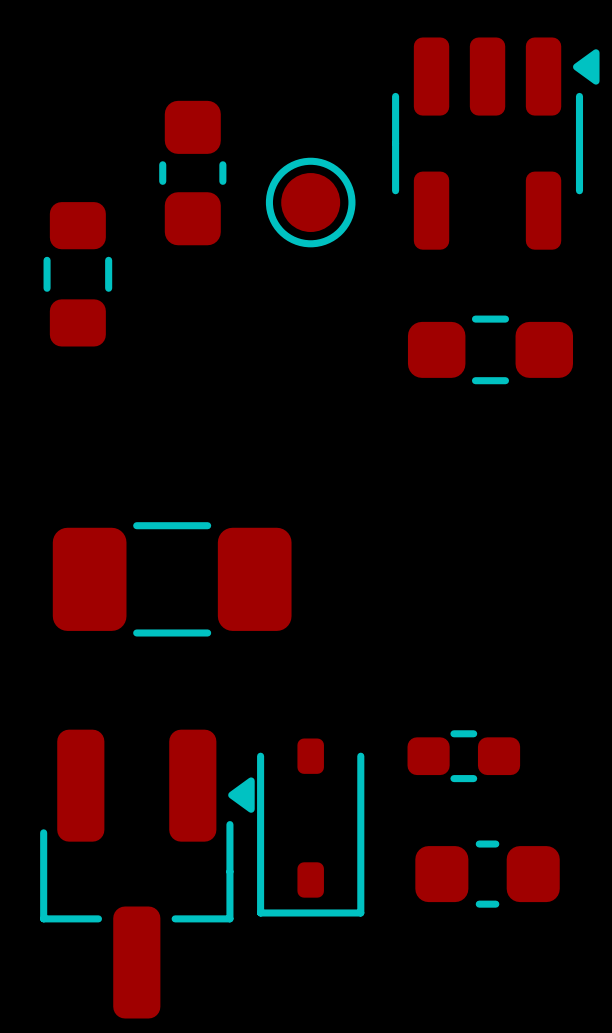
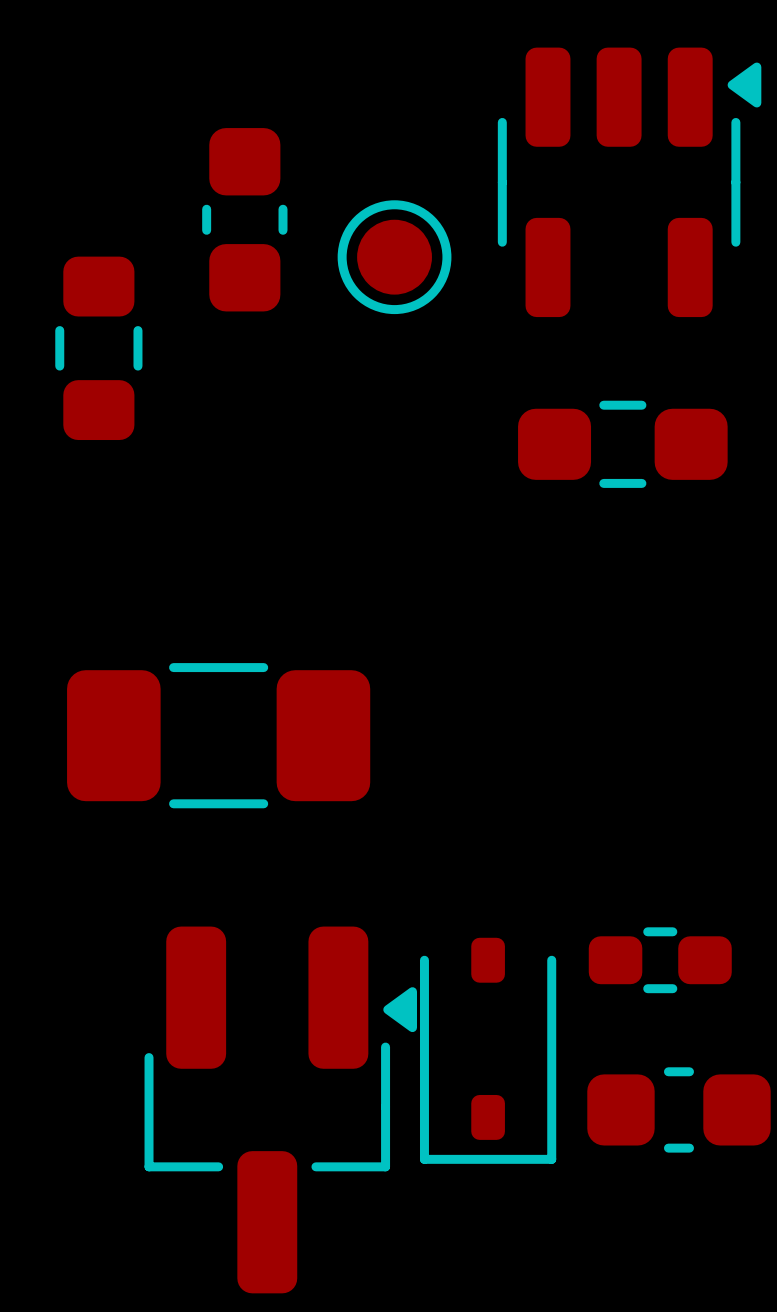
part position: (463, 756) -> (660, 960)
part position: (310, 827) -> (488, 1050)
part position: (147, 874) -> (280, 1109)
part position: (487, 874) -> (678, 1109)

